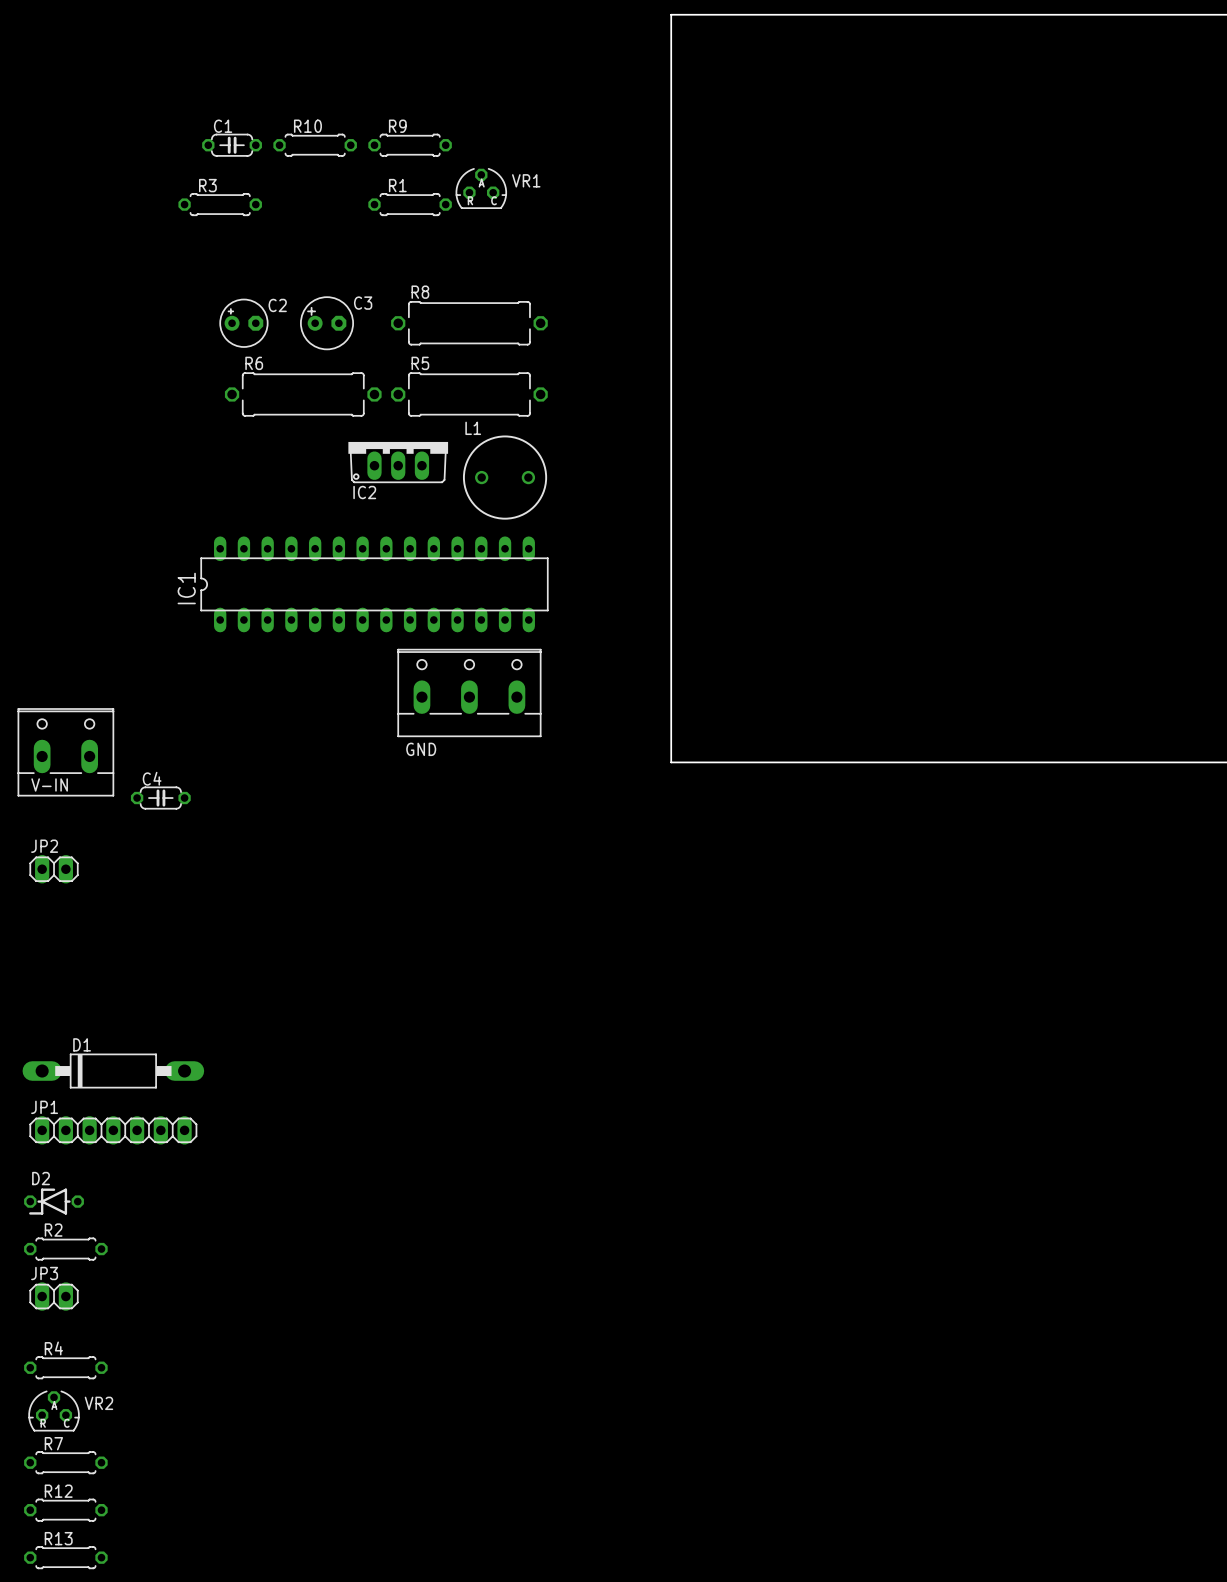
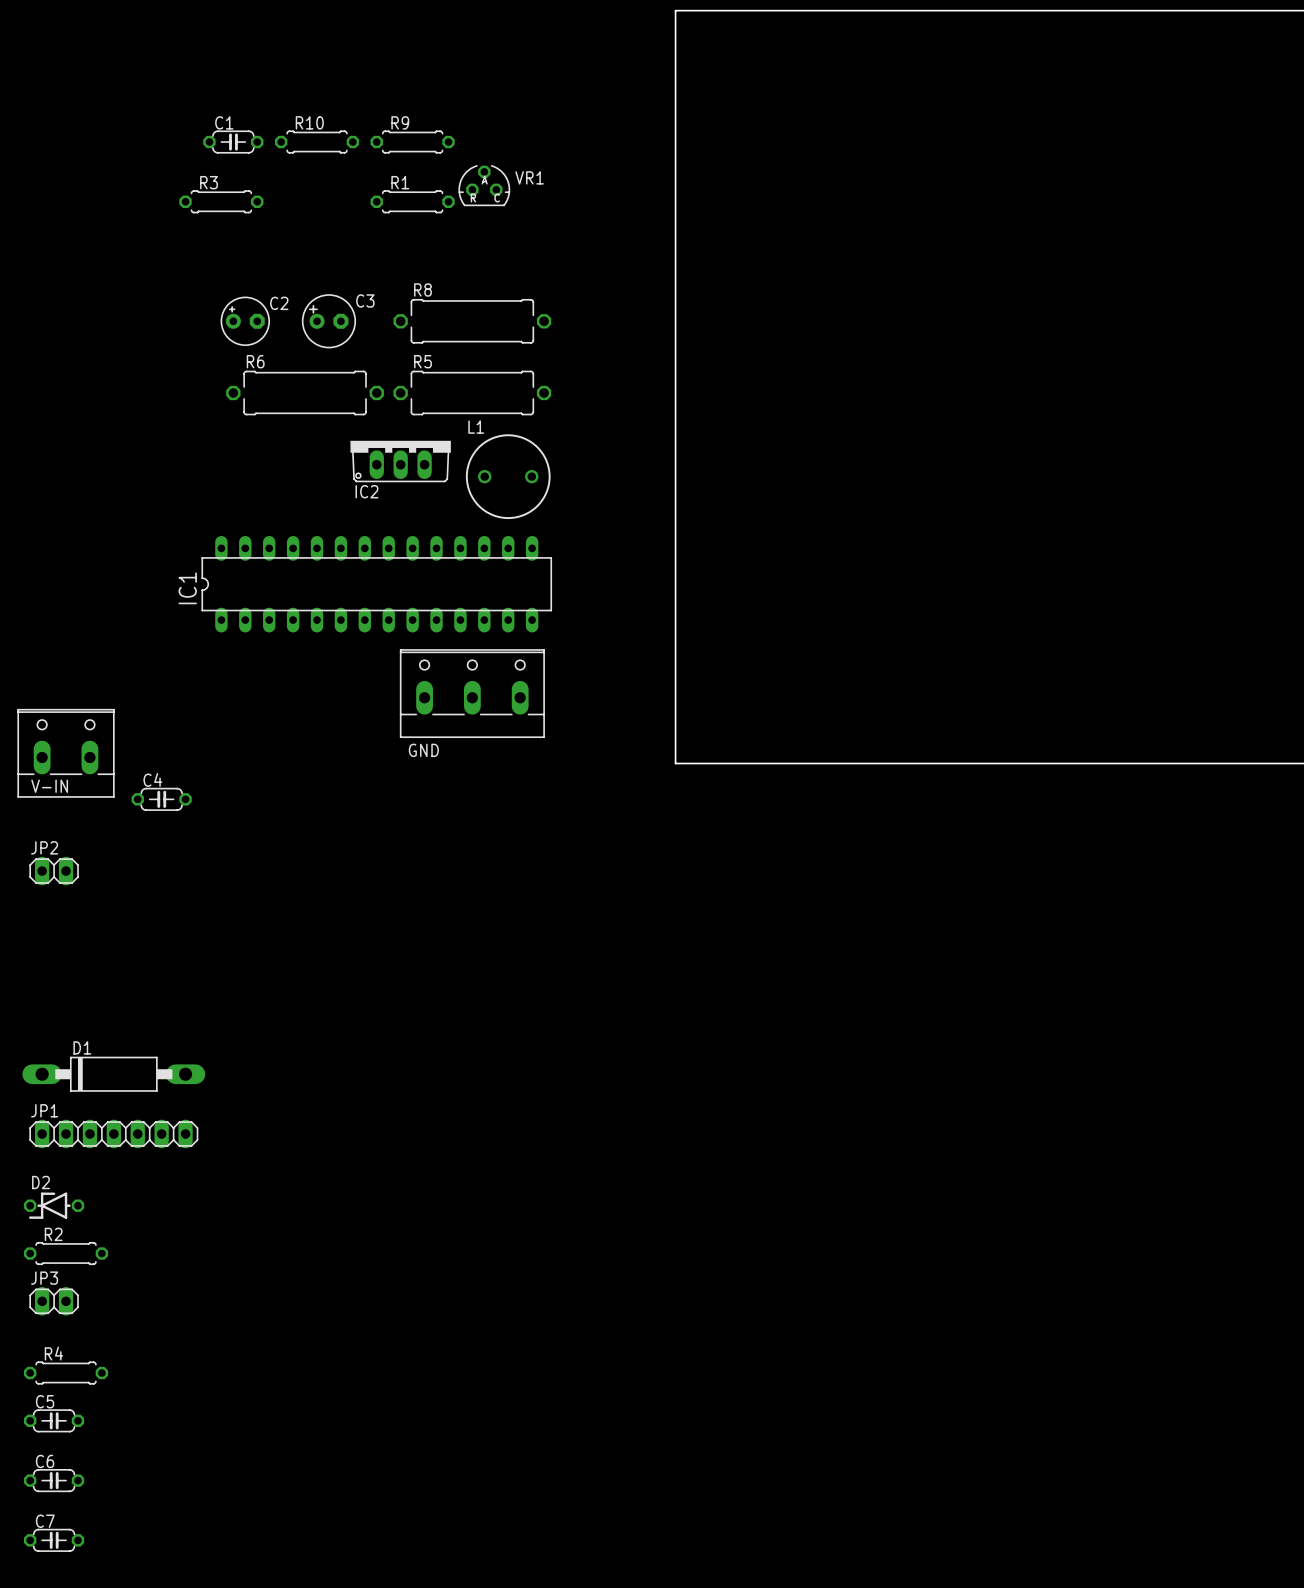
VR2: (54, 1411) -> none
C5: none -> (54, 1420)
R7: (65, 1462) -> none
C6: none -> (54, 1480)
R12: (65, 1510) -> none
C7: none -> (54, 1540)
R13: (65, 1557) -> none

